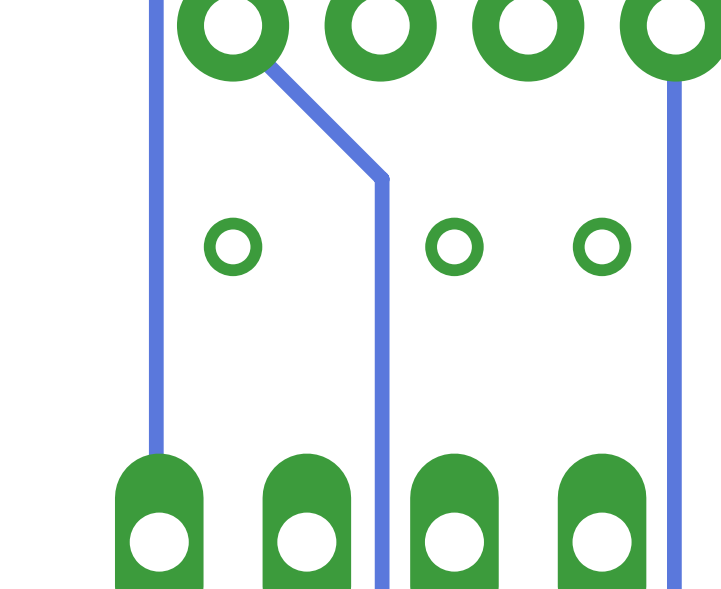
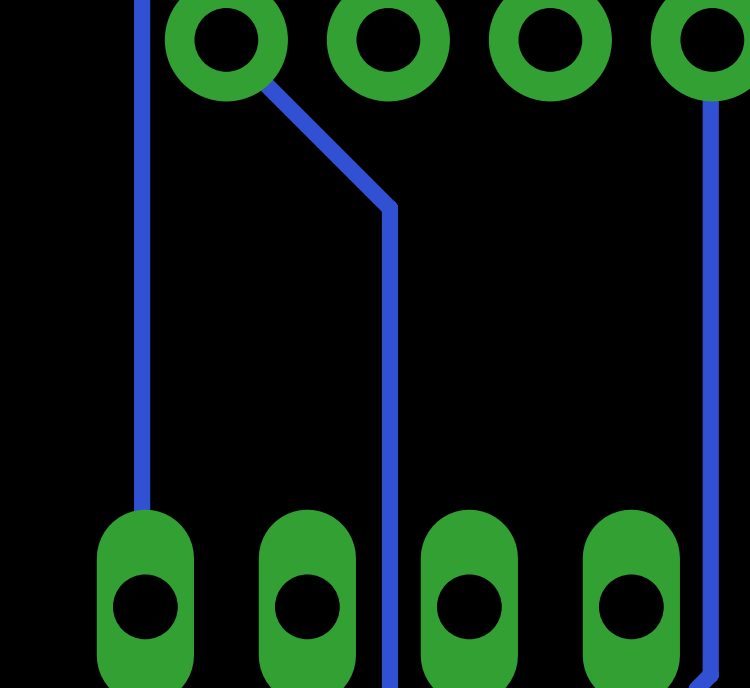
via: (233, 246) -> none
via: (454, 246) -> none
via: (602, 246) -> none

